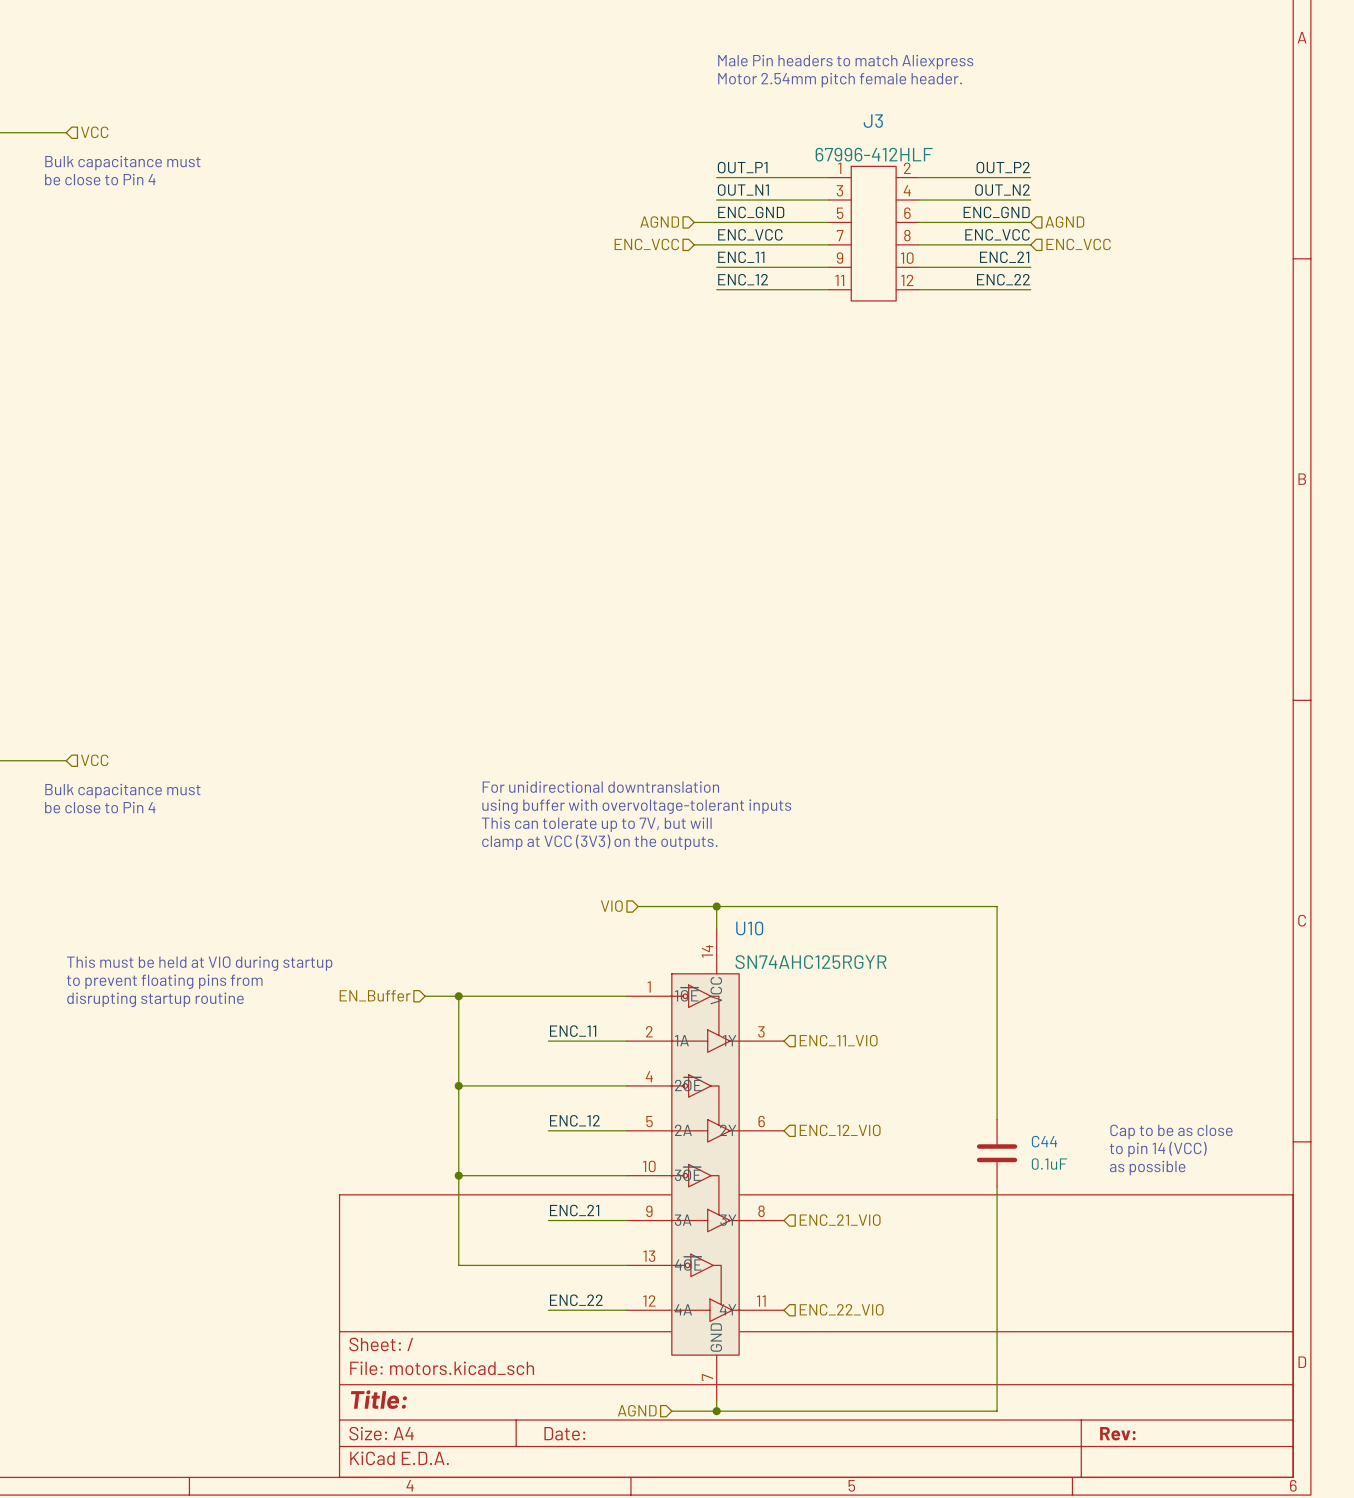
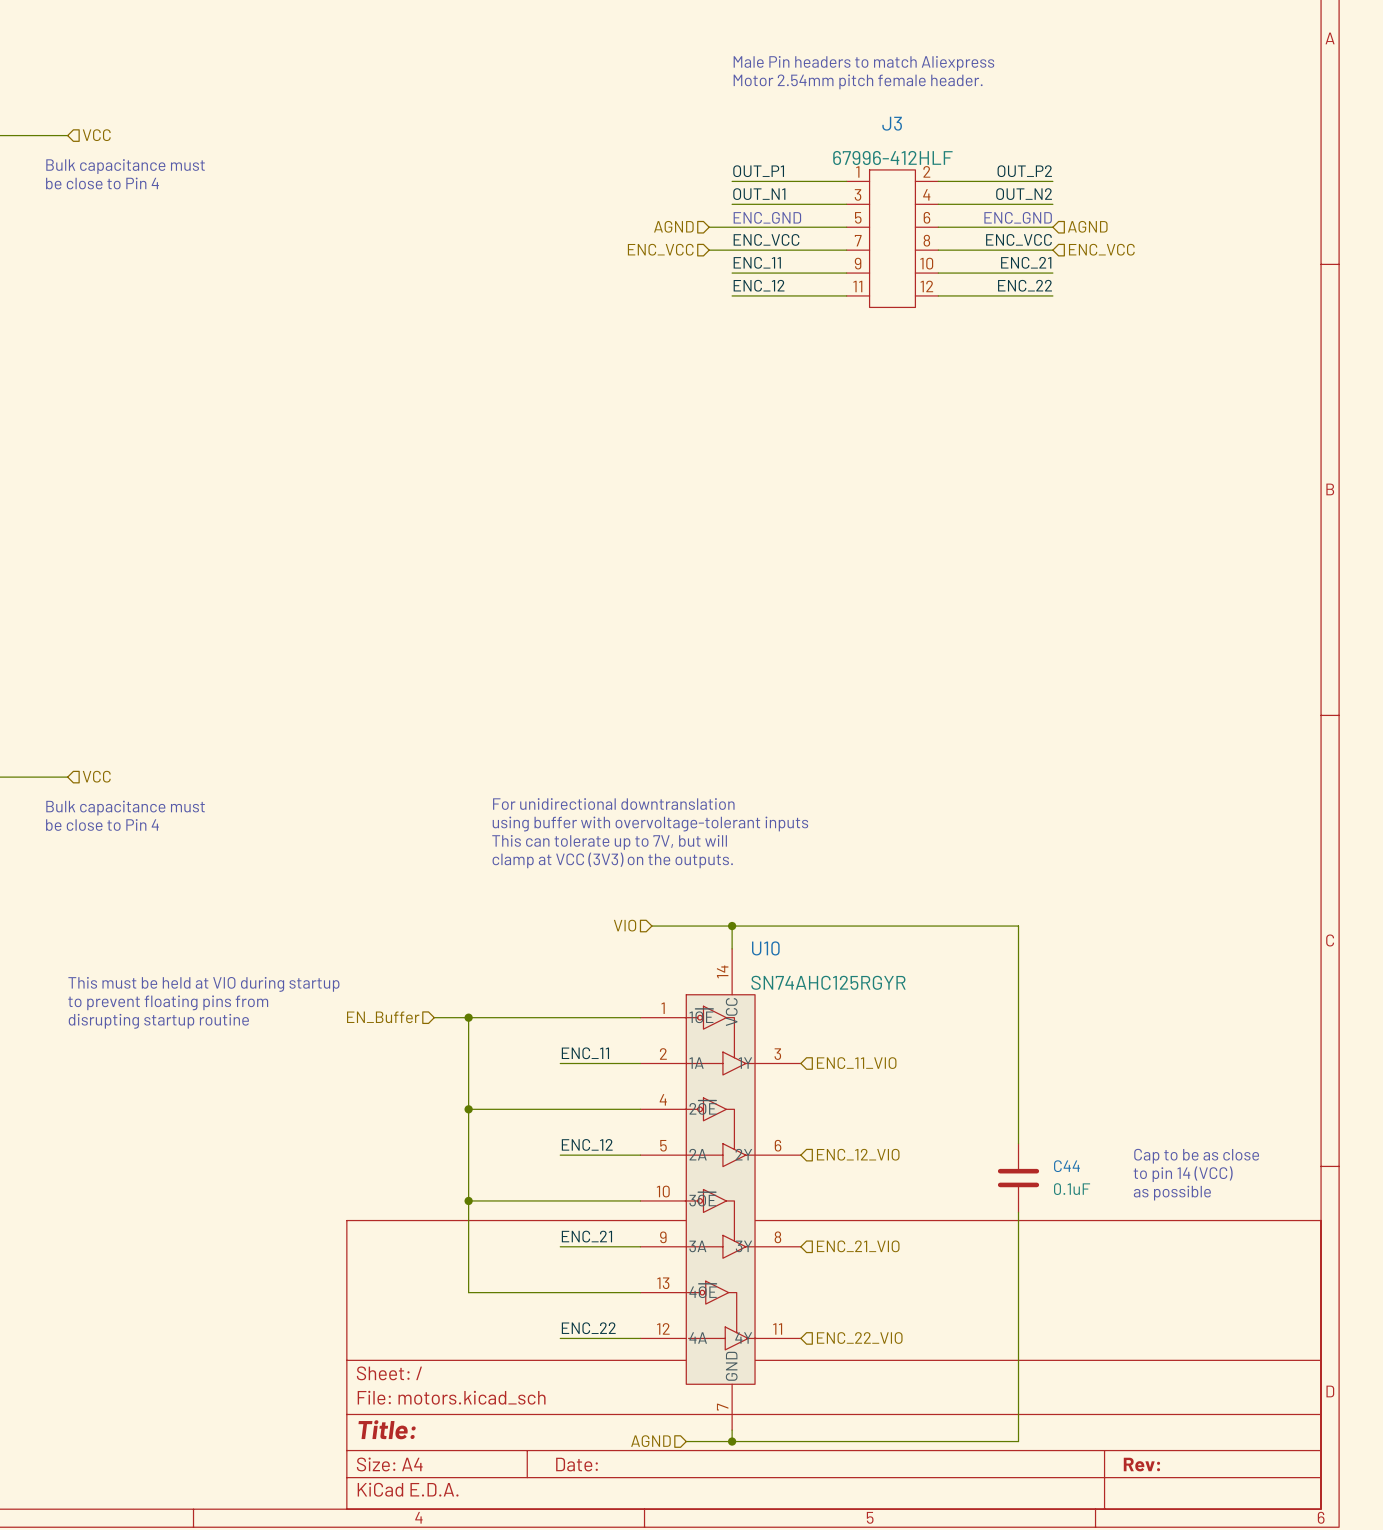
label: ENC_GND (751, 212) -> none
label: ENC_GND (996, 212) -> none
text: none -> ENC_GND (767, 217)
text: none -> ENC_GND (1018, 217)

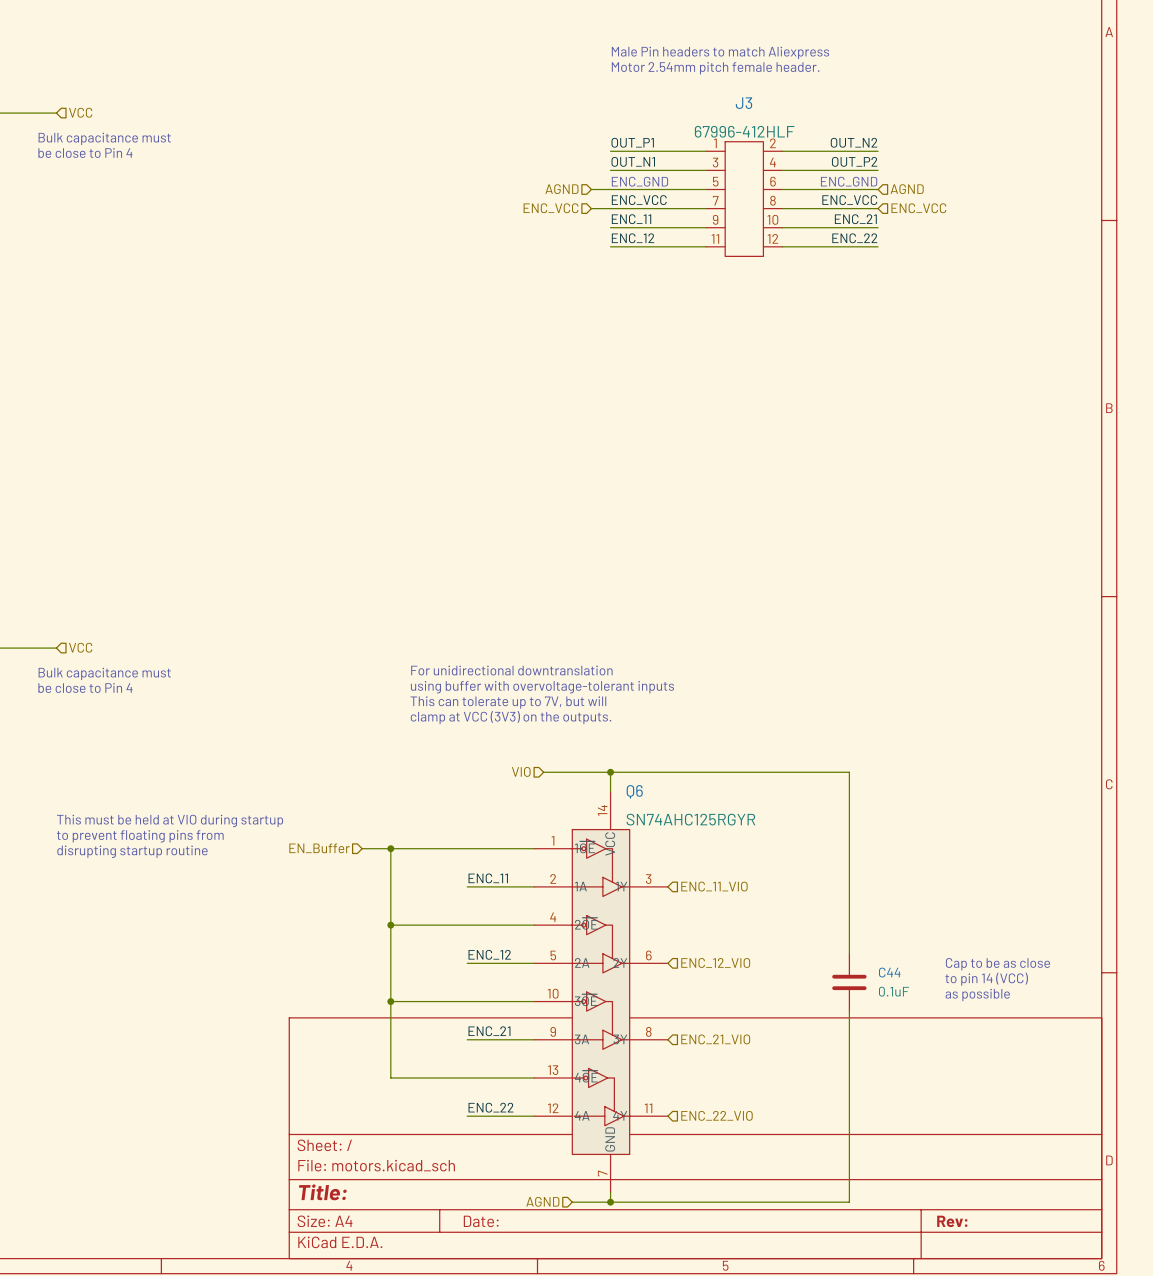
label: OUT_P2 (1024, 171) -> OUT_N2 (854, 142)
label: OUT_N2 (1024, 194) -> OUT_P2 (854, 161)
U10 name: U10 (765, 948) -> Q6 (634, 791)

